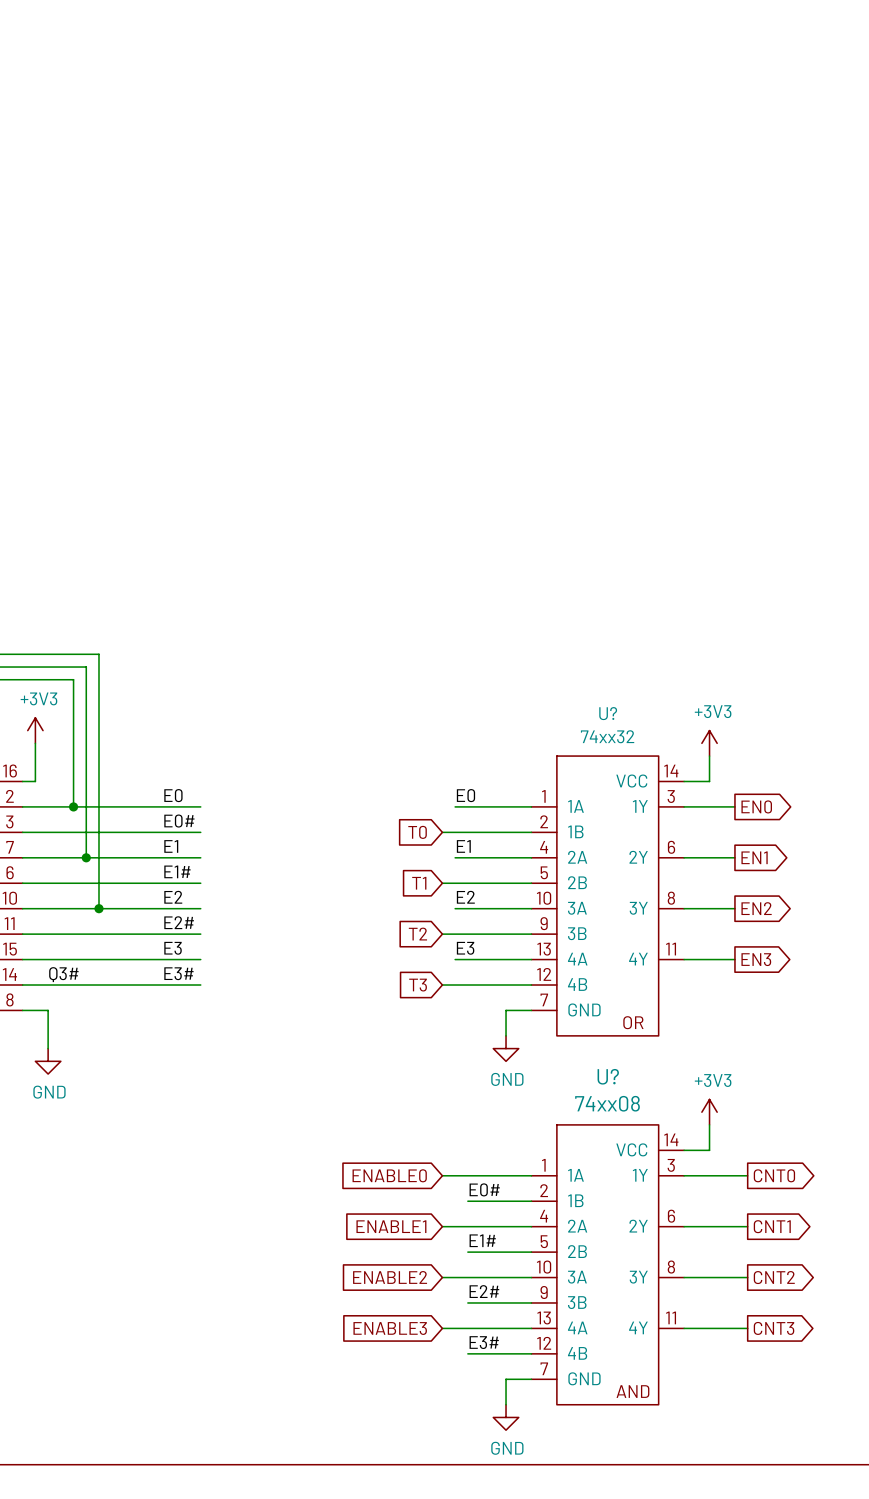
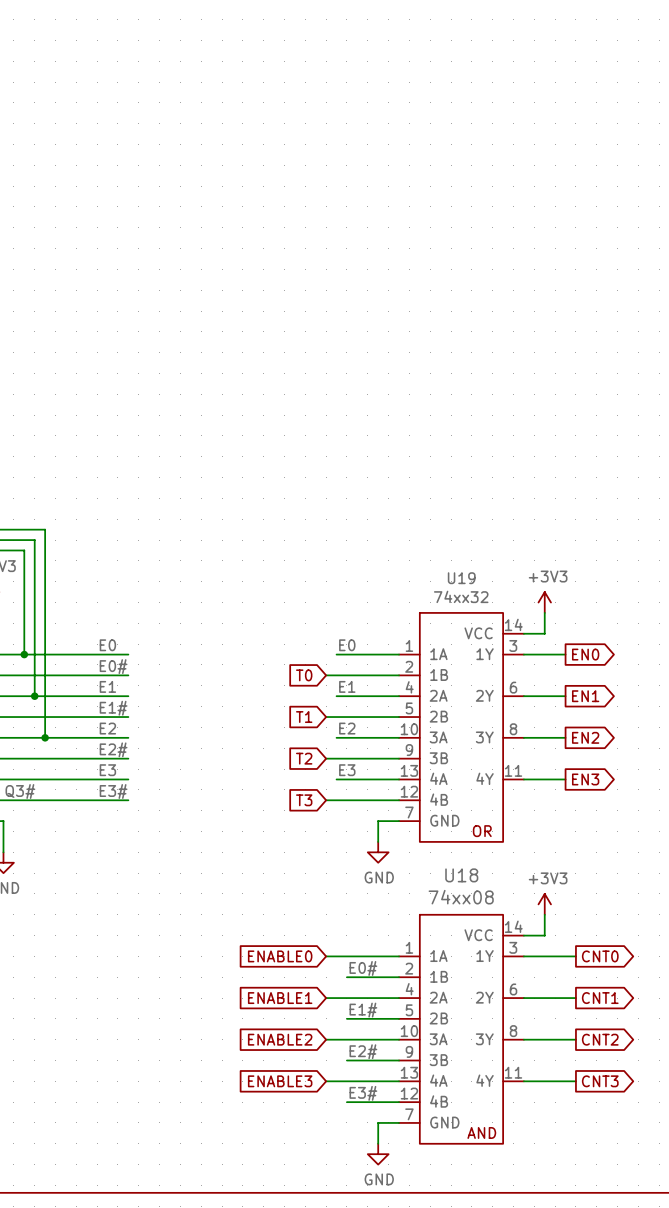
U? name: U? (608, 713) -> U19 (461, 578)
U? name: U? (608, 1076) -> U18 (461, 875)

